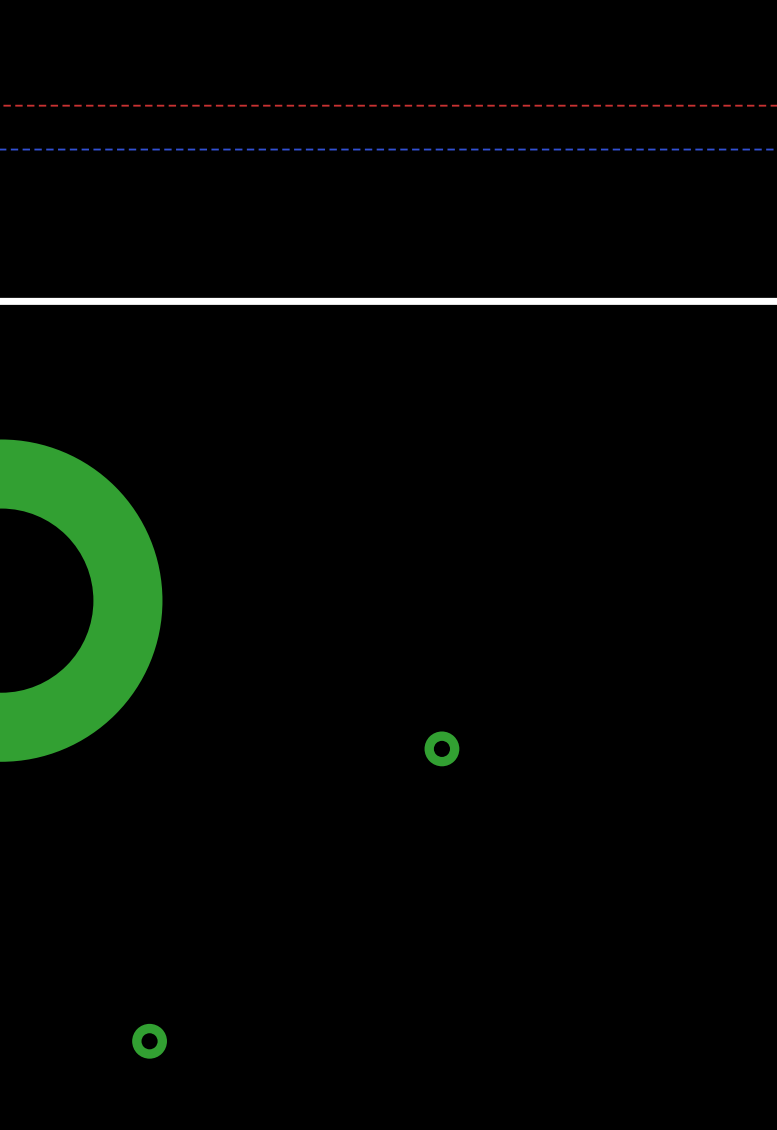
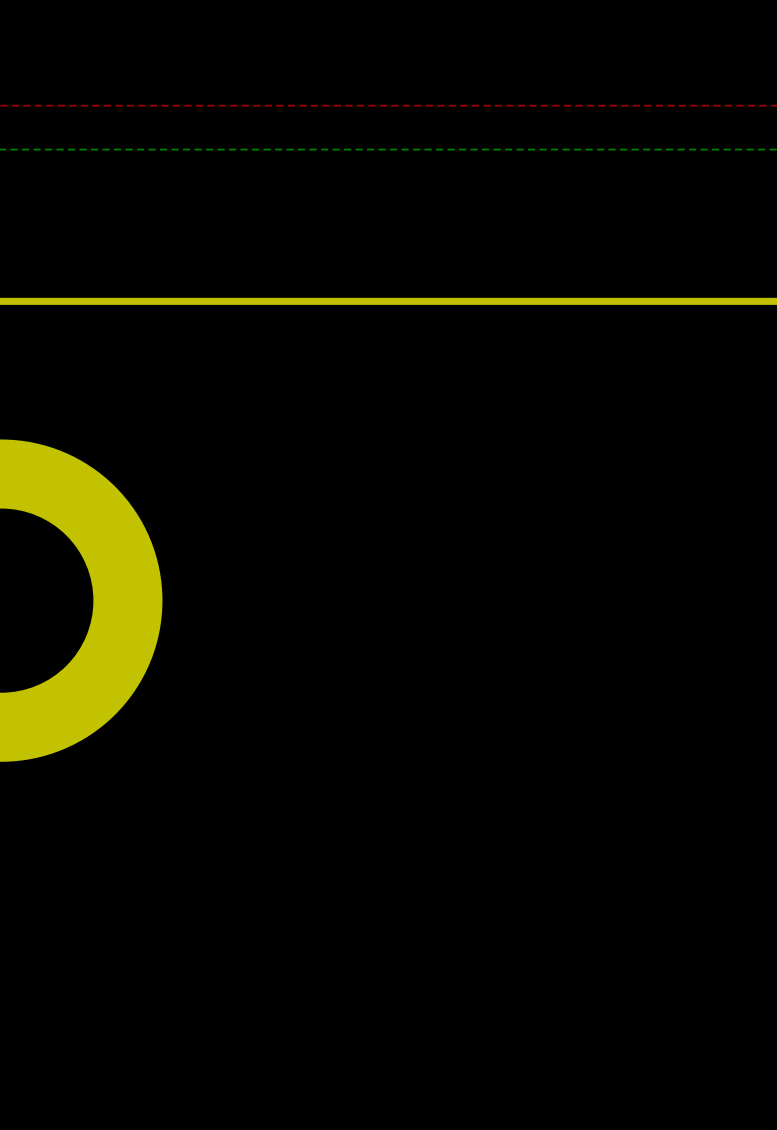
via: (441, 748) -> none
via: (149, 1041) -> none

